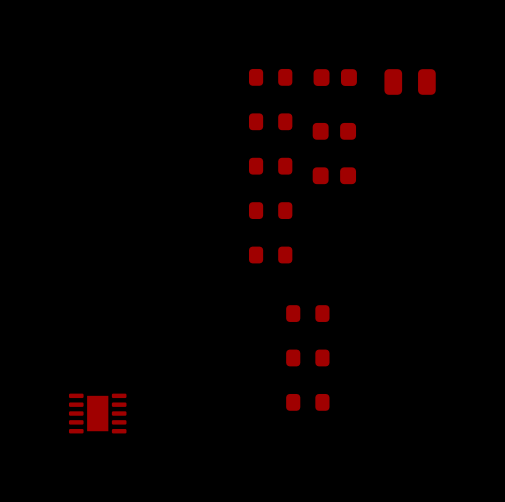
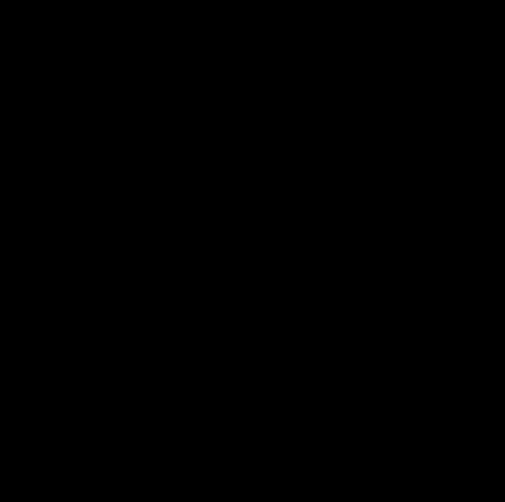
part: (270, 77) -> none
part: (335, 77) -> none
part: (410, 81) -> none
part: (270, 121) -> none
part: (334, 131) -> none
part: (270, 166) -> none
part: (334, 175) -> none
part: (270, 210) -> none
part: (270, 255) -> none
part: (307, 313) -> none
part: (307, 357) -> none
part: (307, 402) -> none
part: (97, 413) -> none

